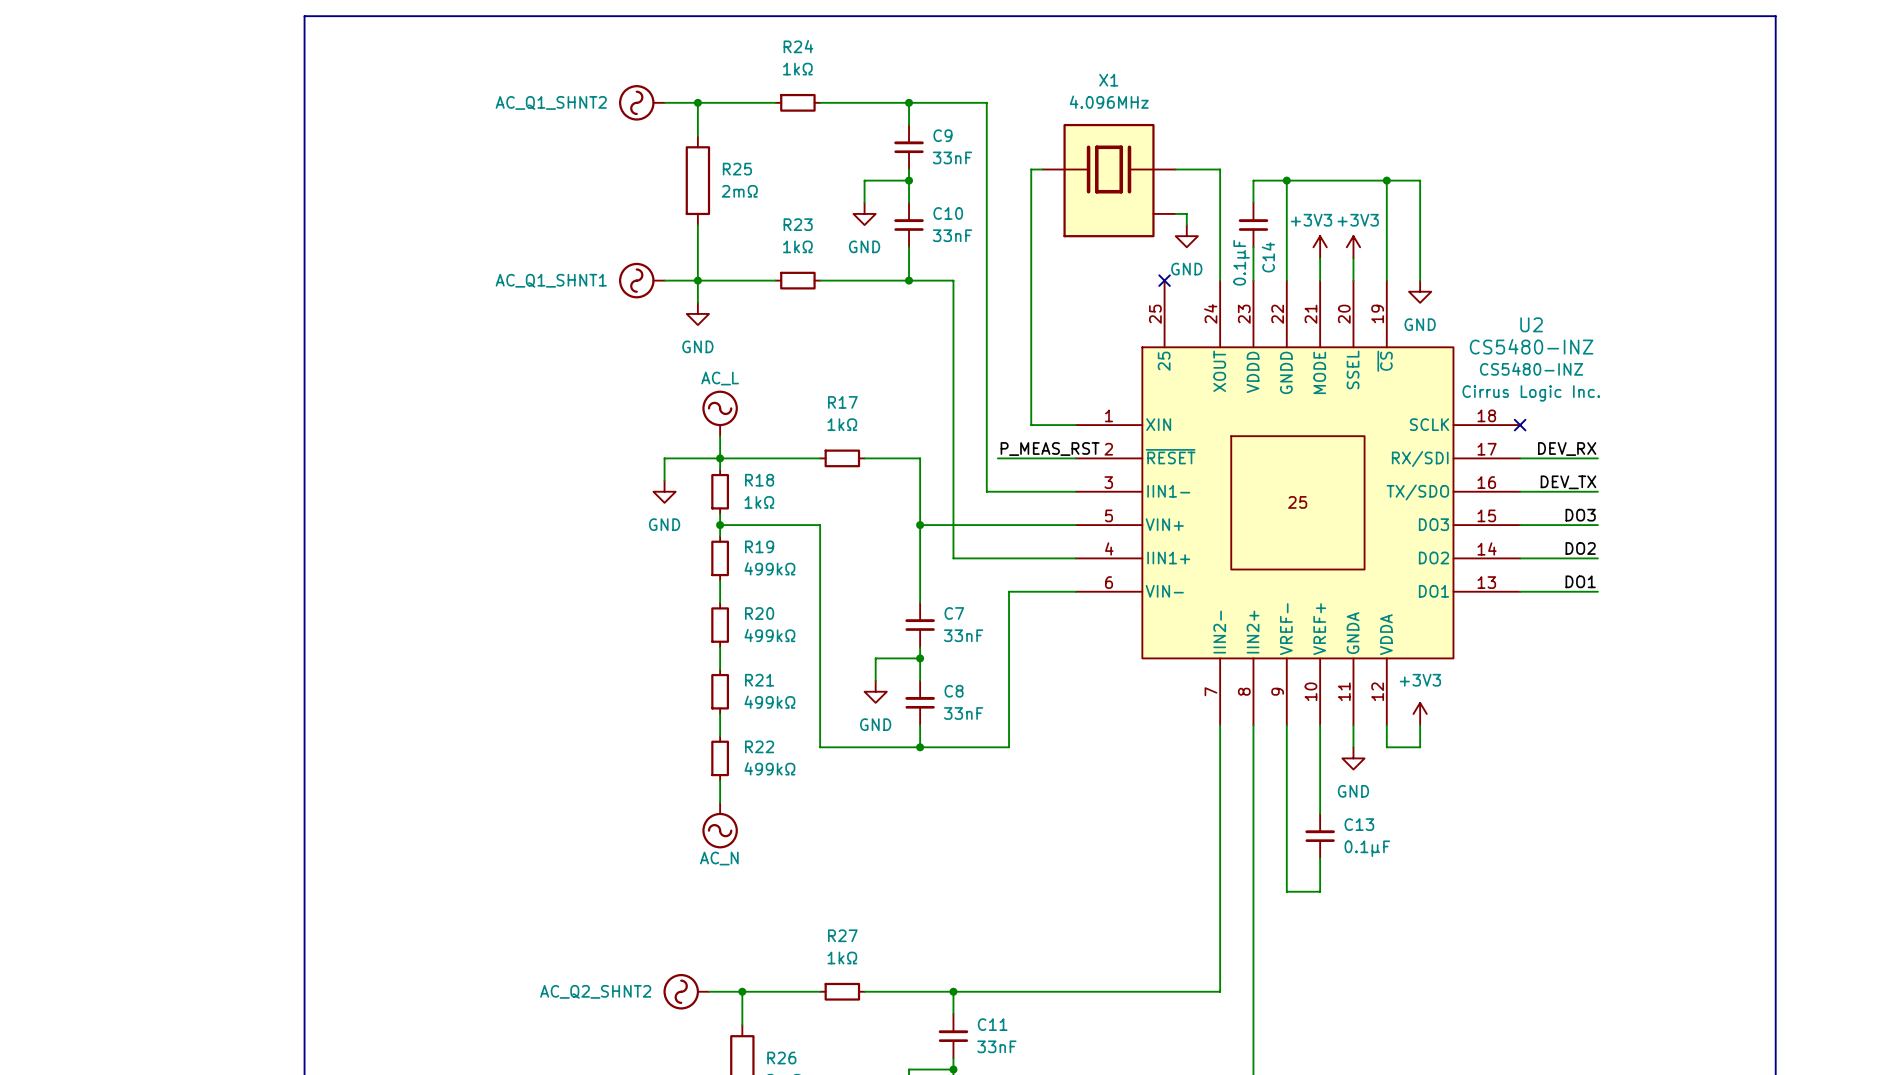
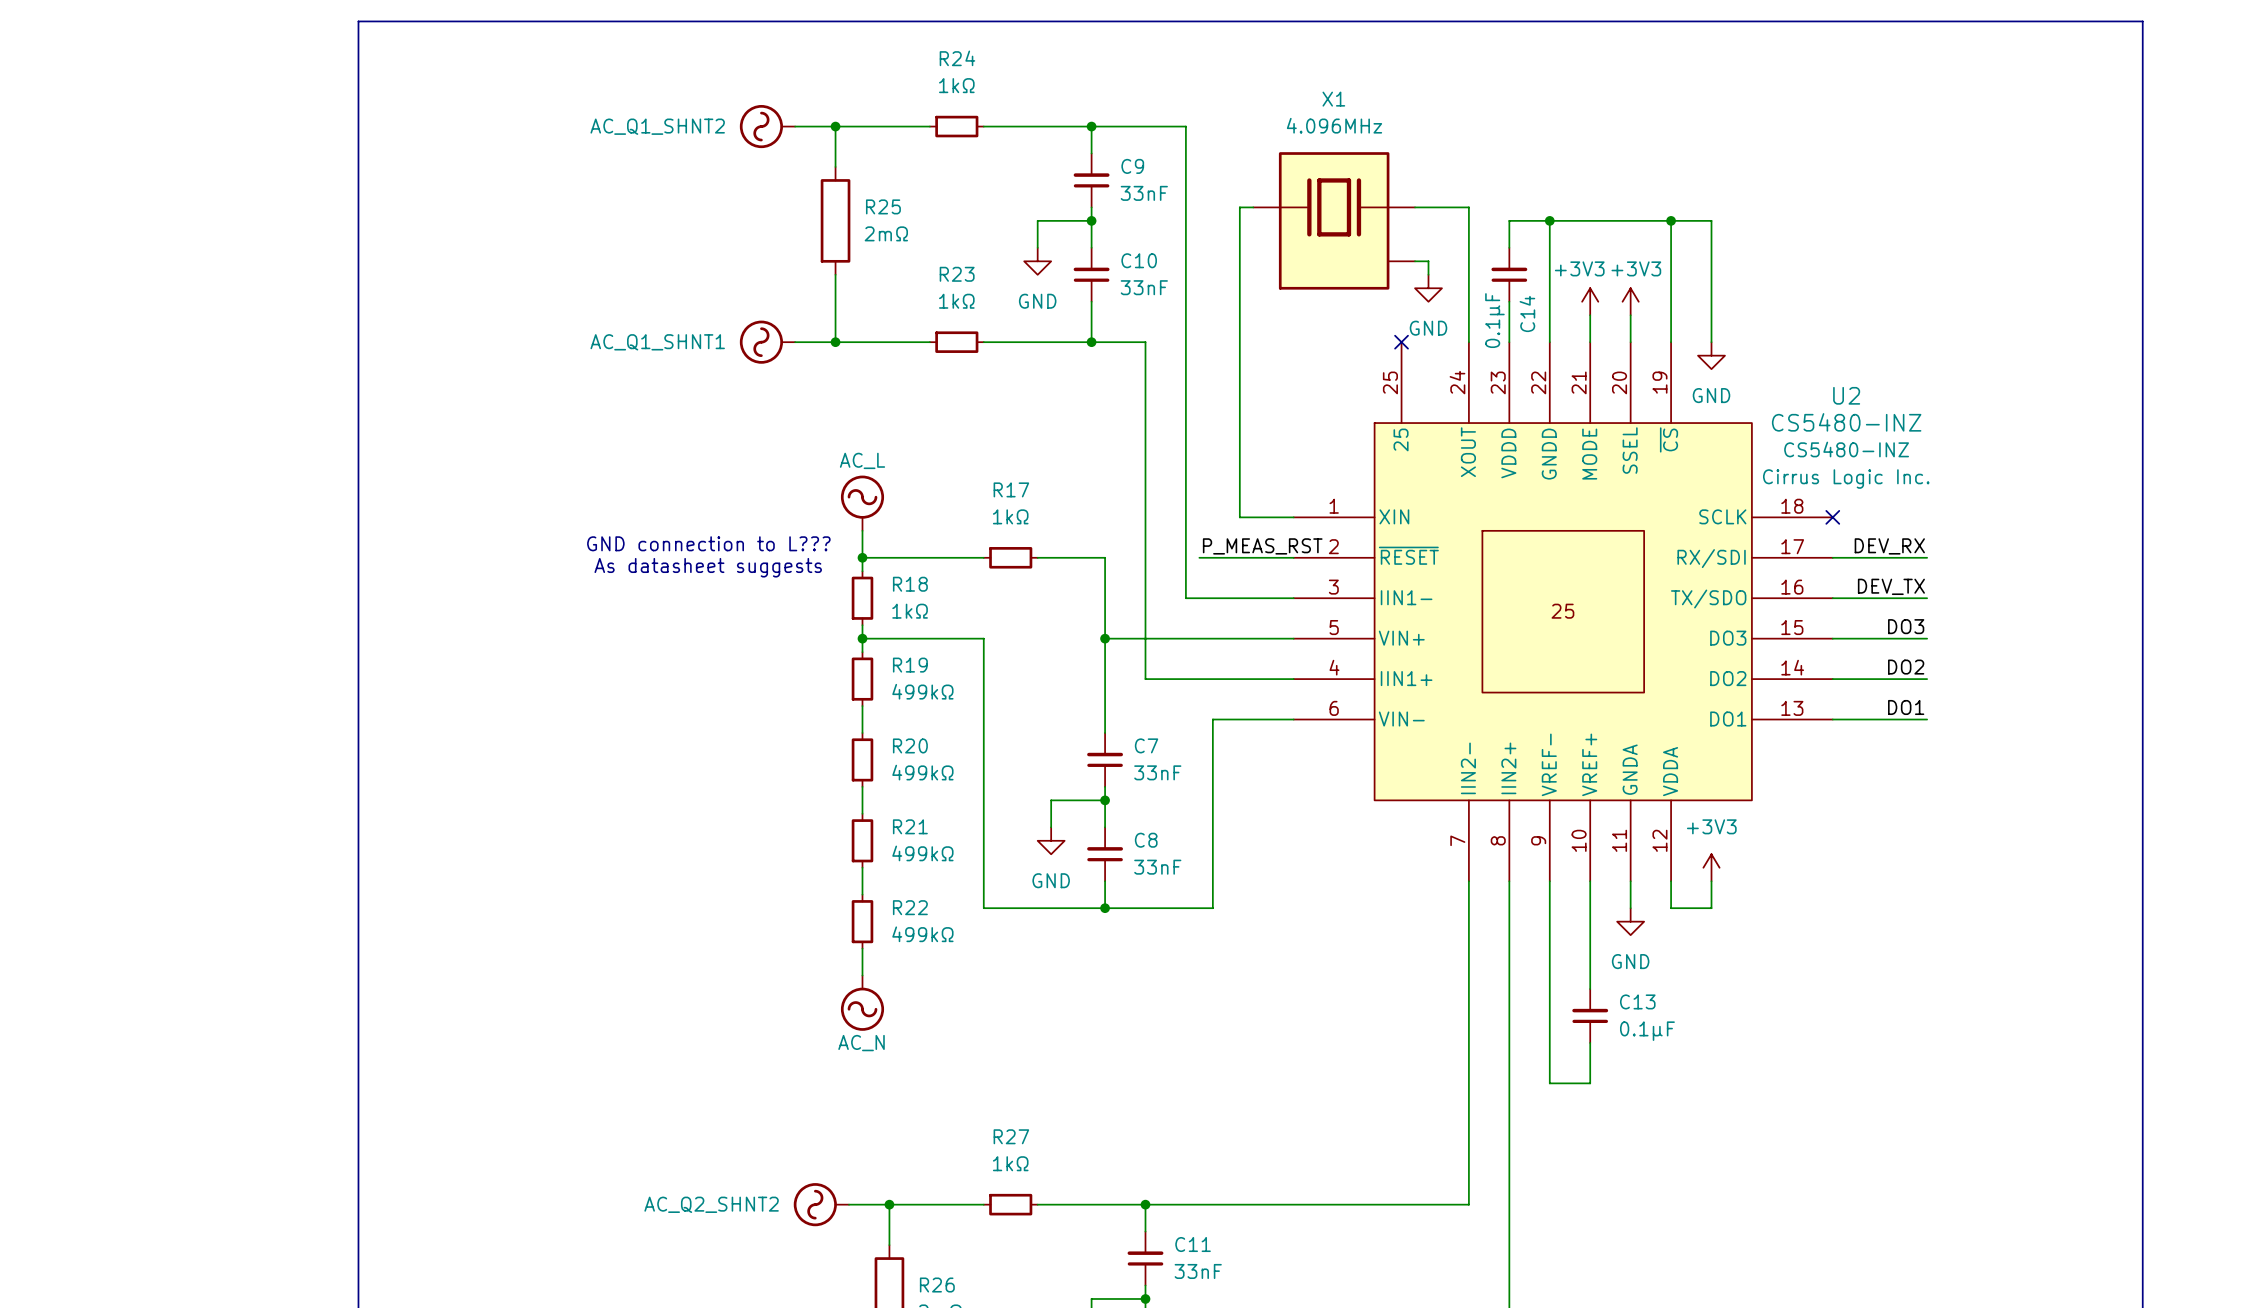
wire: (697, 280) (697, 302) -> none
power symbol: GND (697, 313) -> none
text: none -> GND connection to L??? (708, 543)
wire: (720, 458) (664, 458) (664, 480) -> none
text: none -> As datasheet suggests (708, 567)
power symbol: GND (664, 491) -> none

